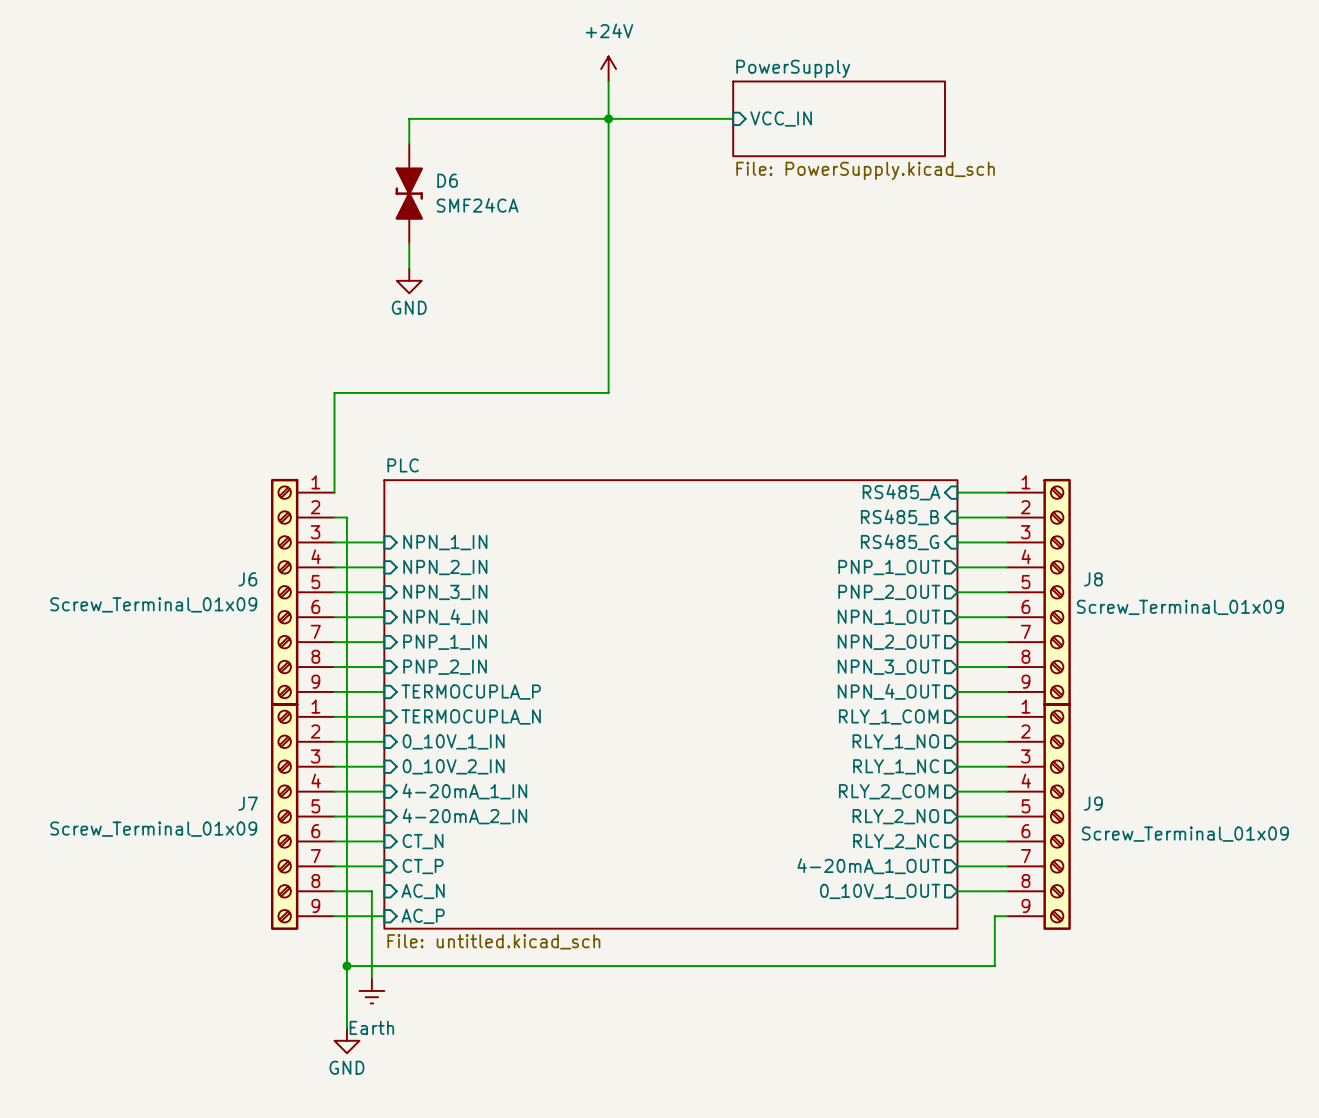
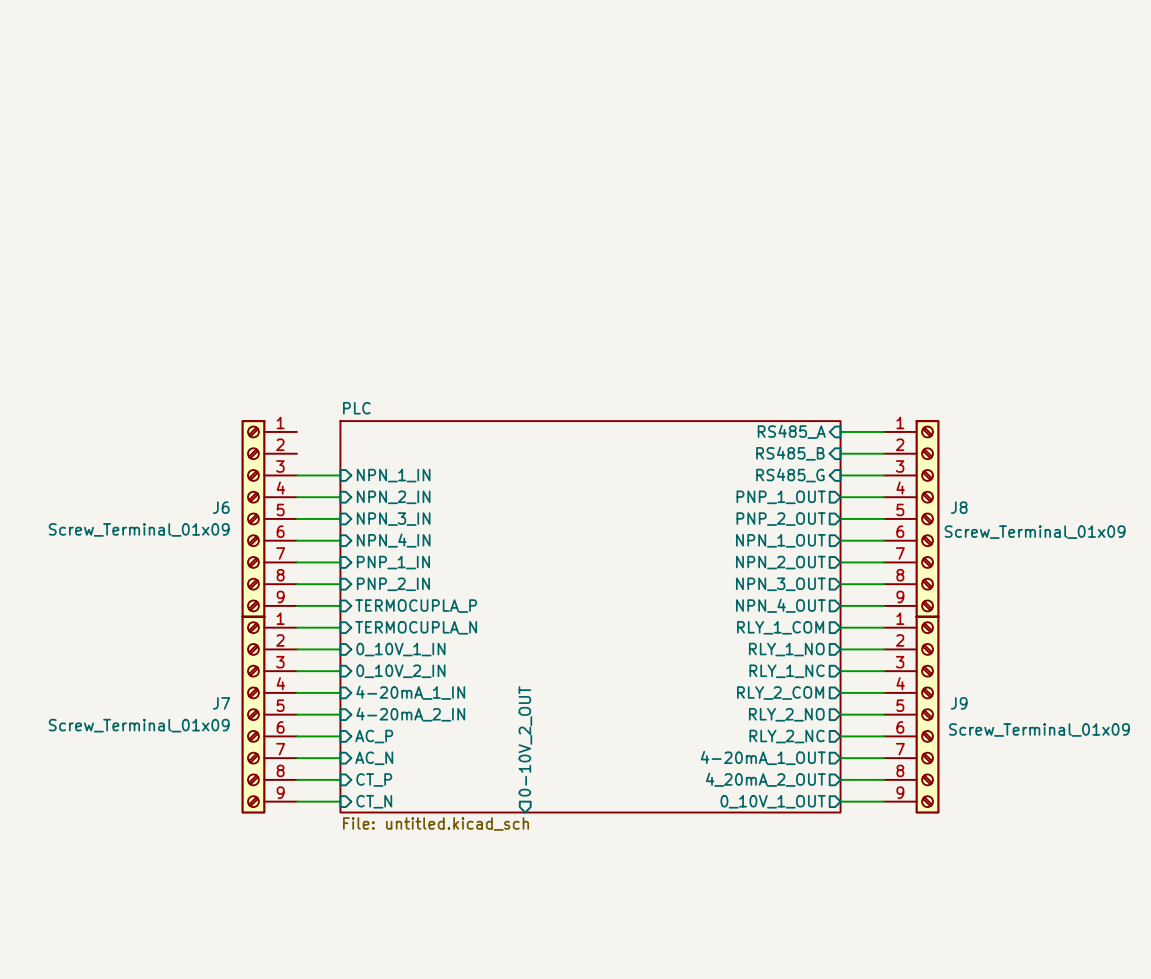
power symbol: +24V (608, 69) -> none
wire: (608, 81) (608, 392) (334, 392) (334, 492) -> none
junction: (608, 118) -> none
wire: (733, 118) (409, 118) (409, 143) -> none
sheet pin: VCC_IN (781, 118) -> none
sheet PowerSupply: File: PowerSupply.kicad_sch (839, 118) -> none
D6: SMF24CA (409, 193) -> none
wire: (409, 243) (409, 268) -> none
power symbol: GND (409, 280) -> none
wire: (334, 517) (346, 517) (346, 1028) -> none
sheet pin: CT_N (423, 841) -> AC_P (374, 736)
sheet pin: none -> 0-10V_2_OUT (525, 741)
sheet pin: CT_P (423, 866) -> AC_N (374, 758)
wire: (371, 891) (371, 978) -> (329, 779) (340, 779)
sheet pin: AC_N (423, 891) -> CT_P (374, 780)
sheet pin: 0_10V_1_OUT (880, 891) -> 4_20mA_2_OUT (765, 779)
sheet pin: AC_P (423, 916) -> CT_N (374, 801)
sheet pin: none -> 0_10V_1_OUT (773, 801)
wire: (994, 916) (994, 966) (346, 966) -> (873, 801) (840, 801)
junction: (346, 966) -> none
power symbol: Earth (371, 990) -> none
power symbol: GND (346, 1040) -> none

